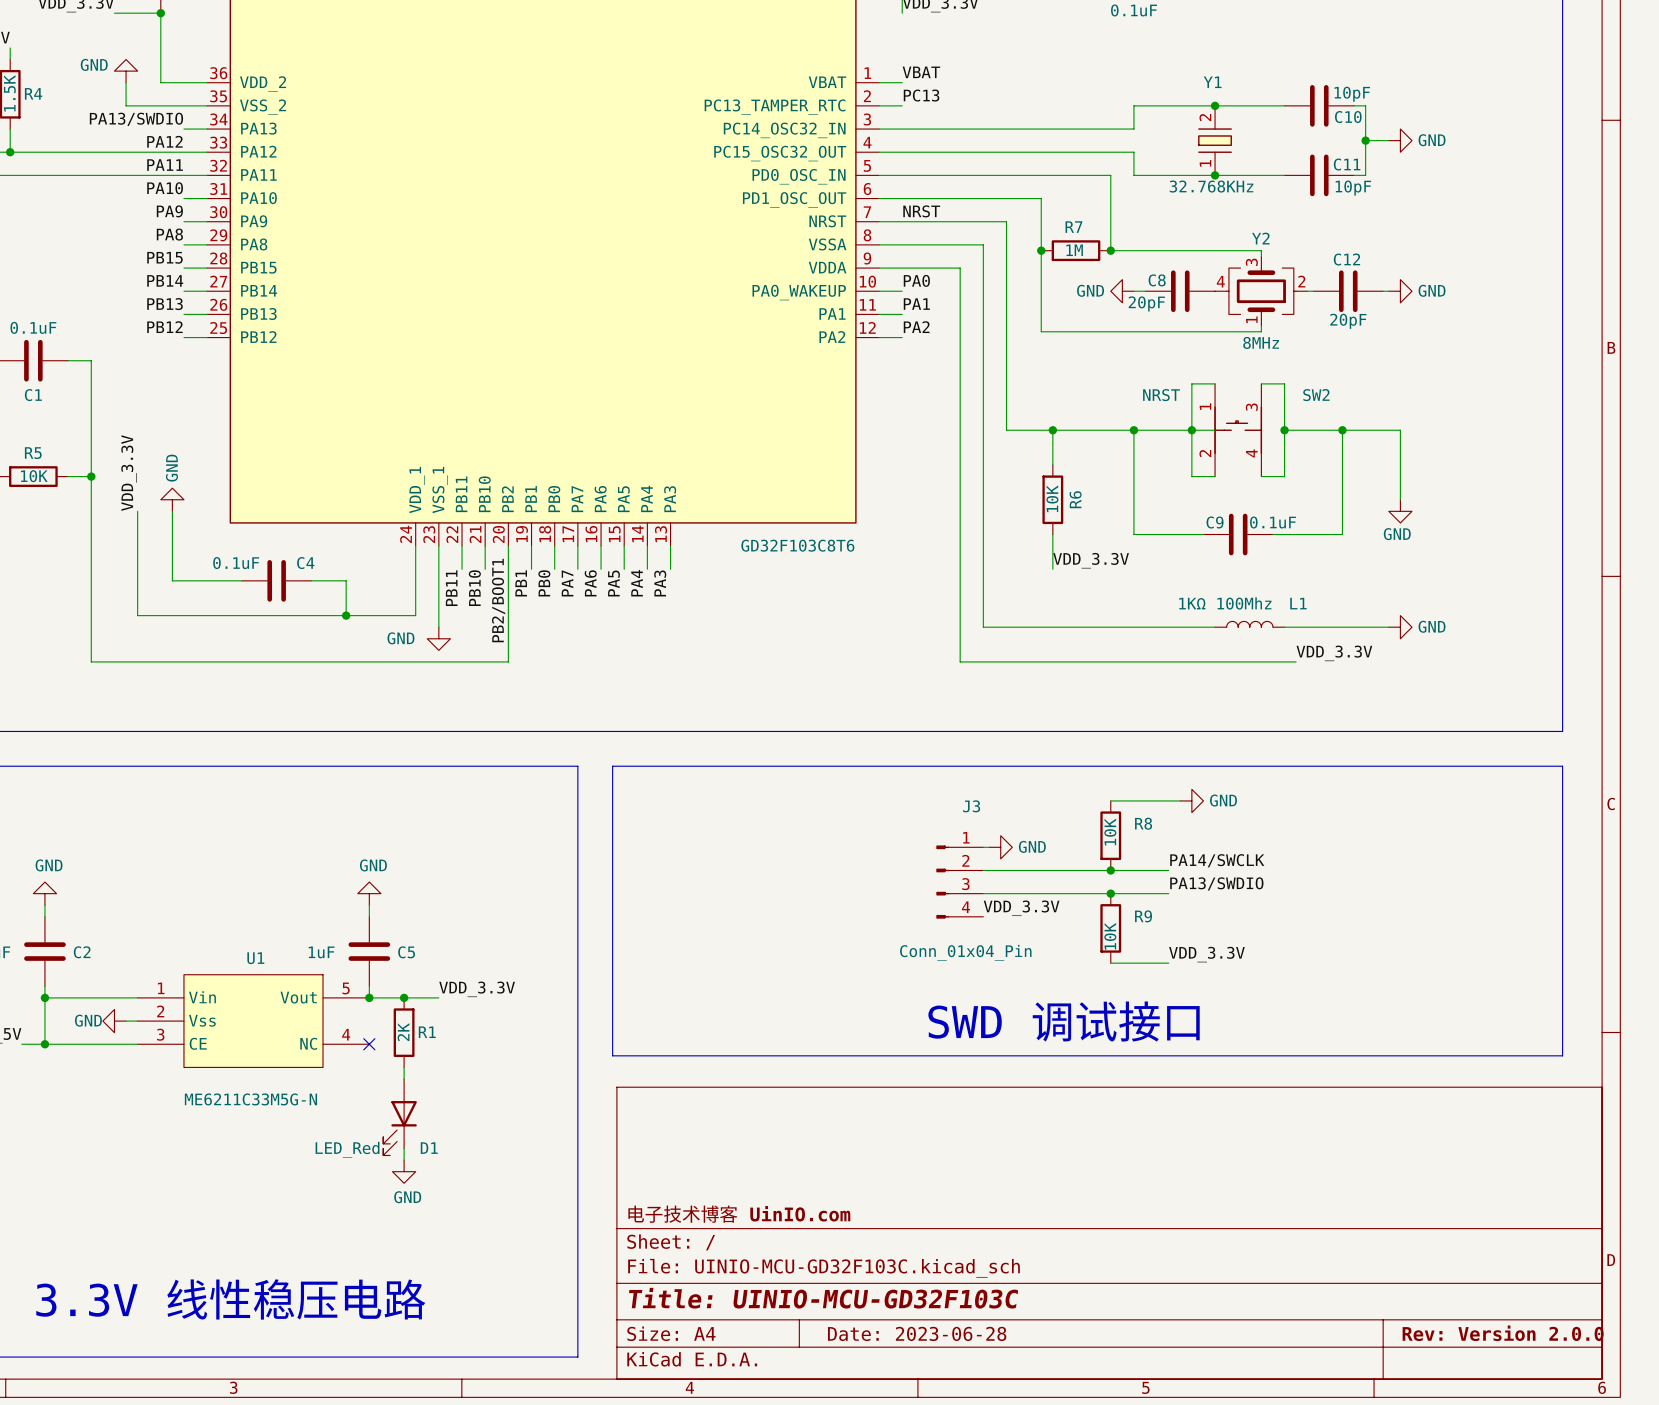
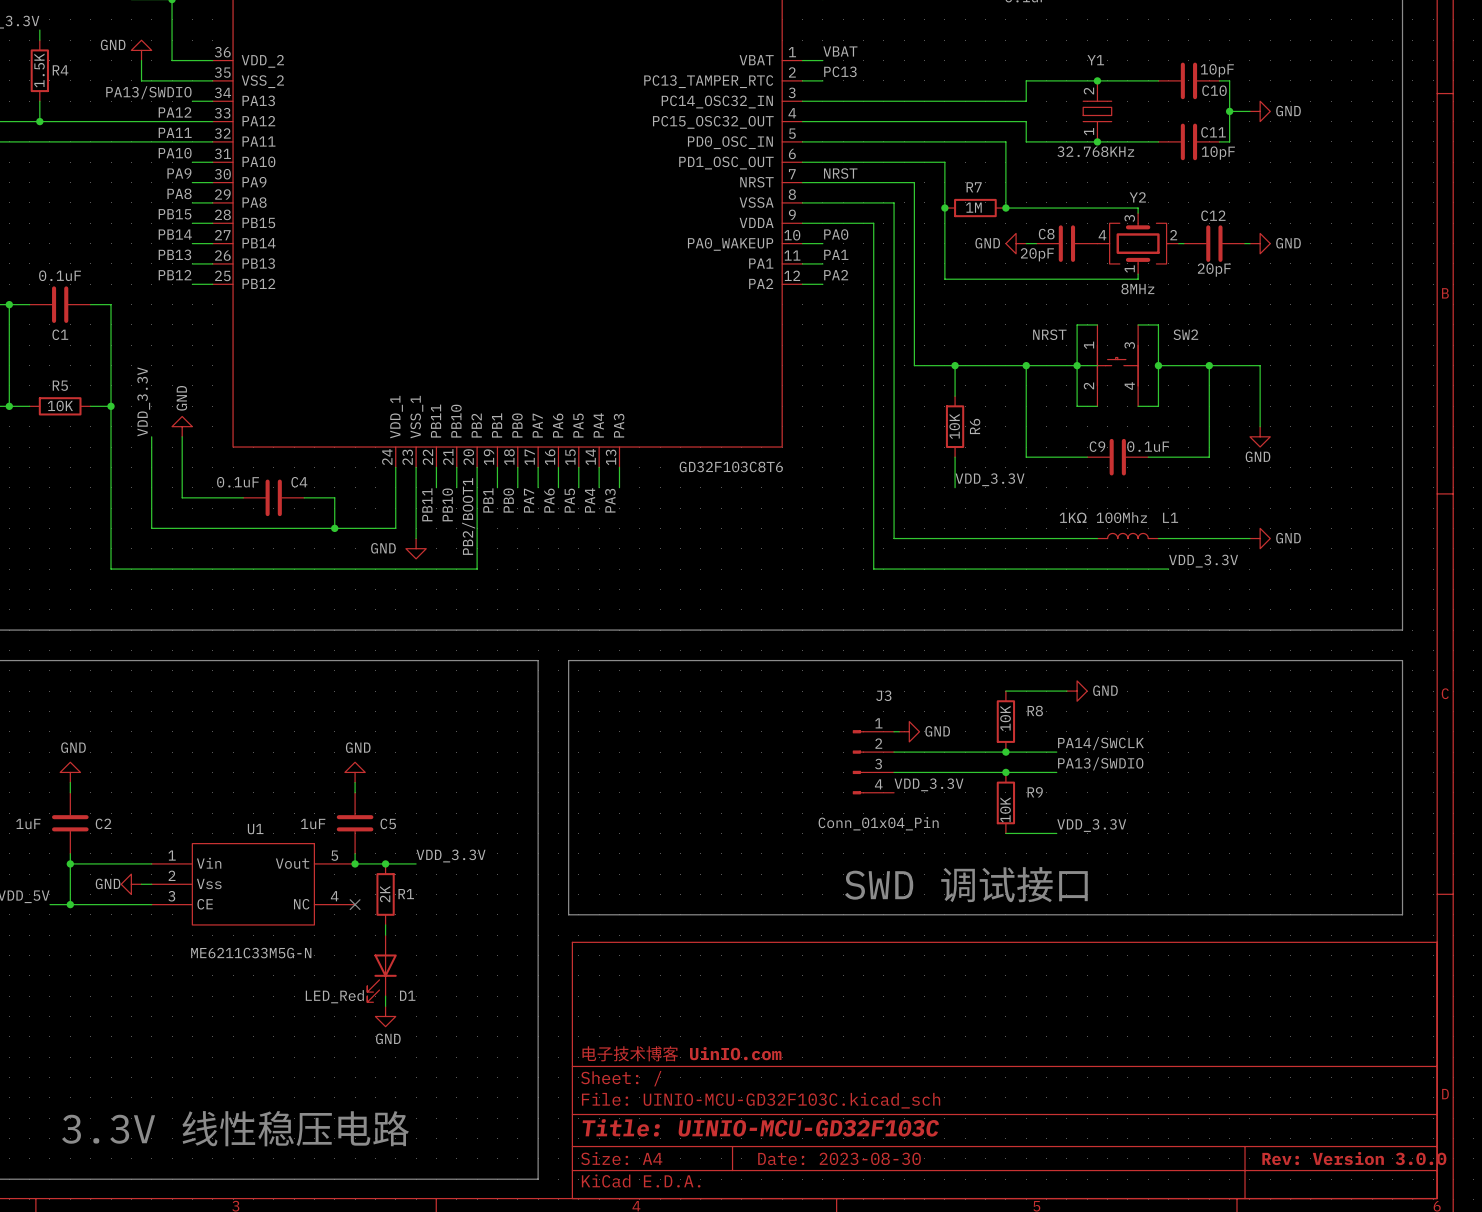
title block: Date: 2023-06-28 (917, 1333) -> Date: 2023-08-30 (839, 1158)
title block: Rev: Version 2.0.0 (1503, 1333) -> Rev: Version 3.0.0 (1354, 1158)

